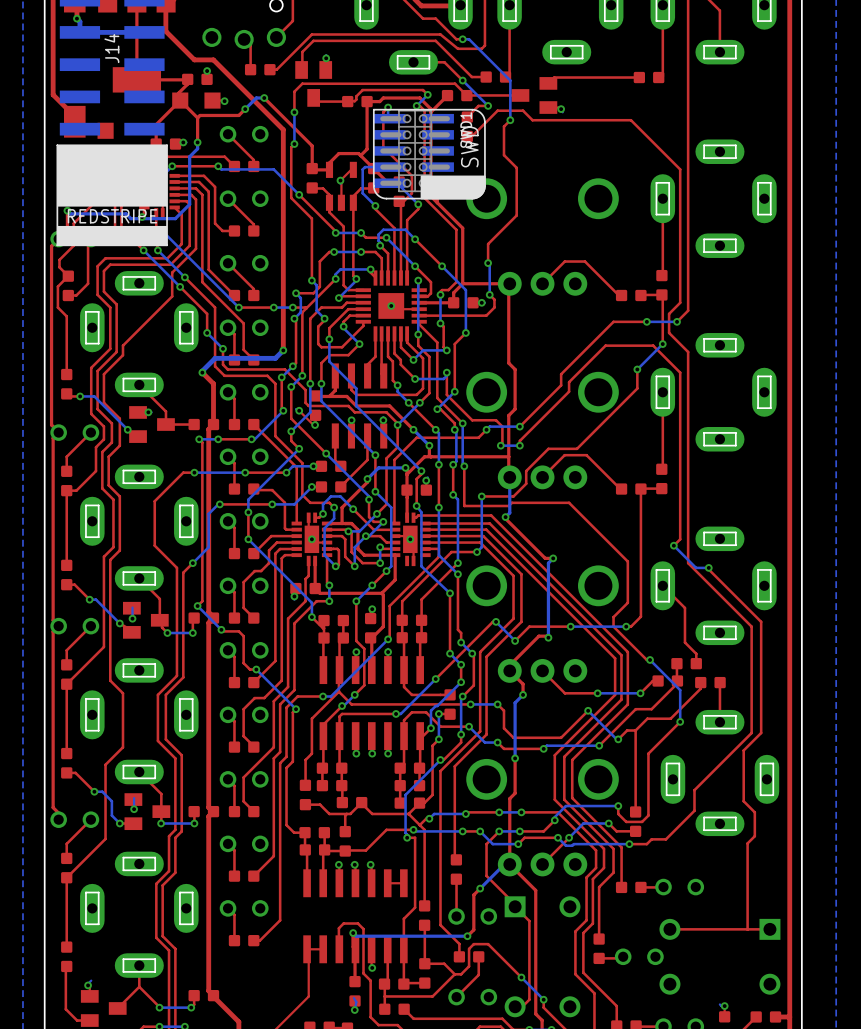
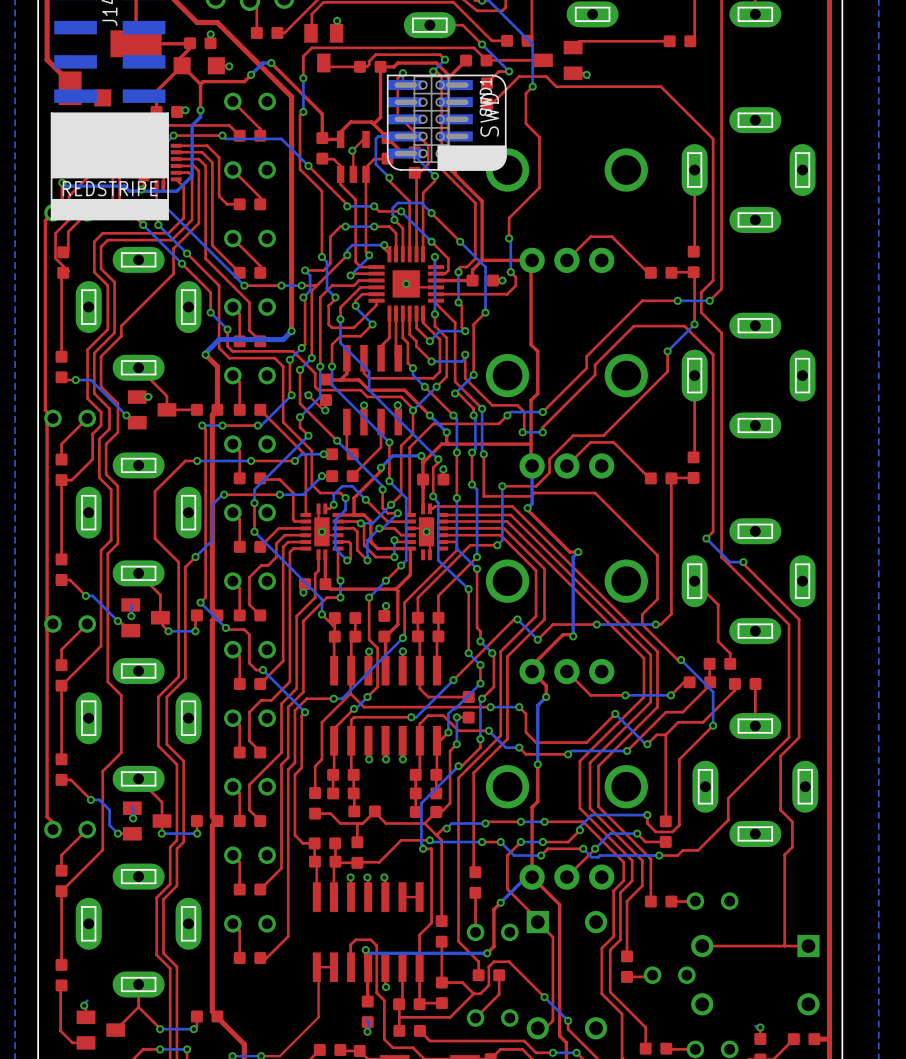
top track: (88, 241) (88, 283) (76, 295) (68, 295) -> (84, 215) (68, 231) (68, 250)
top track: (61, 258) (59, 267) (68, 276) (57, 286) (57, 307) (66, 316) -> (55, 233) (55, 258) (68, 271) (61, 277) (61, 295)

